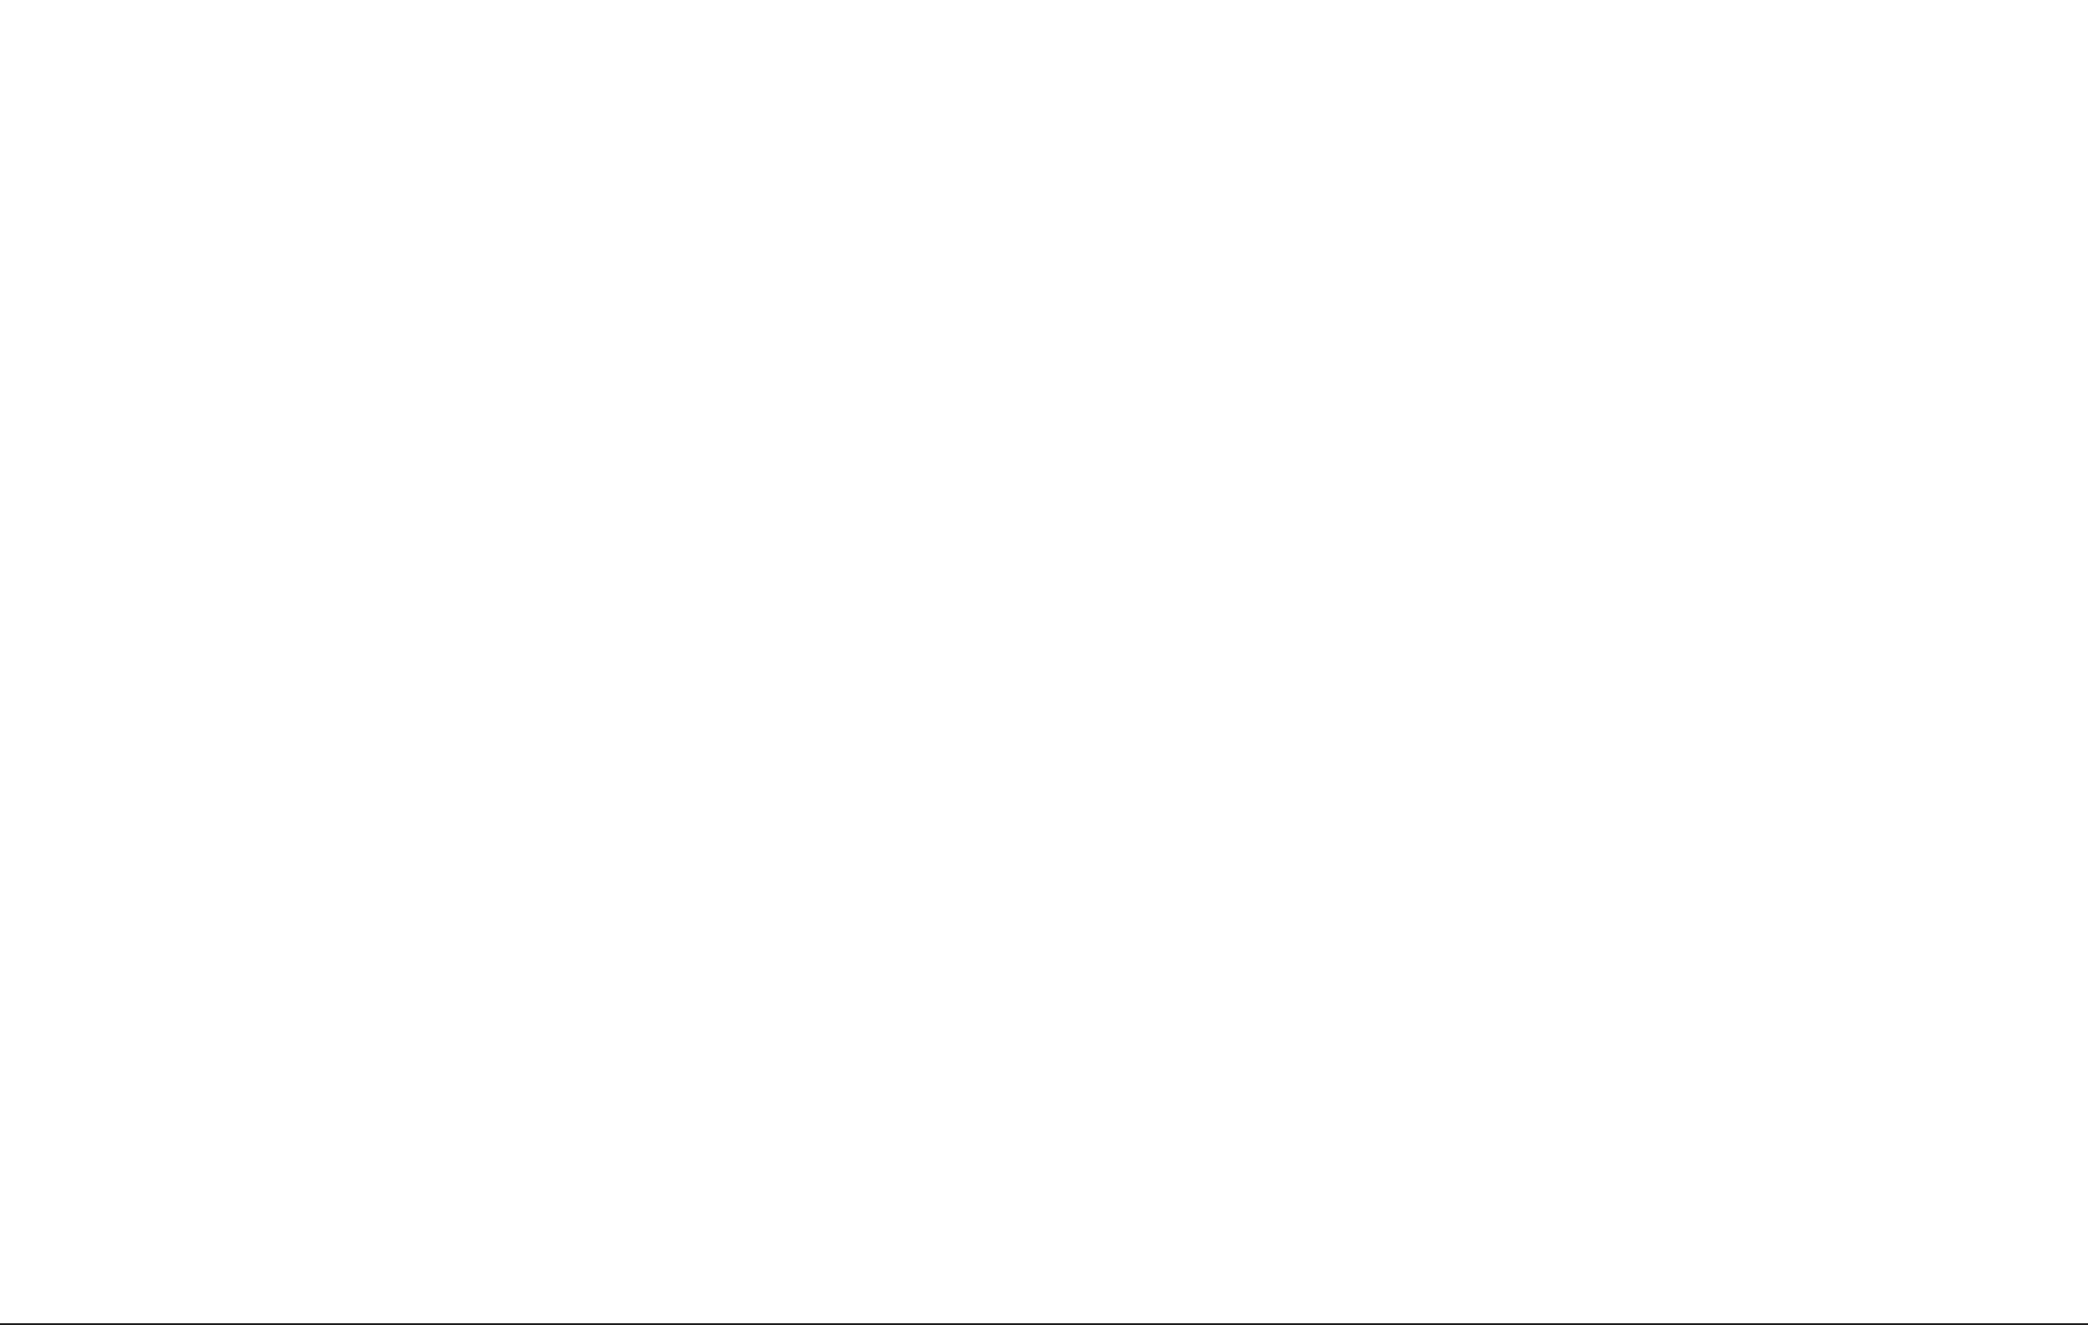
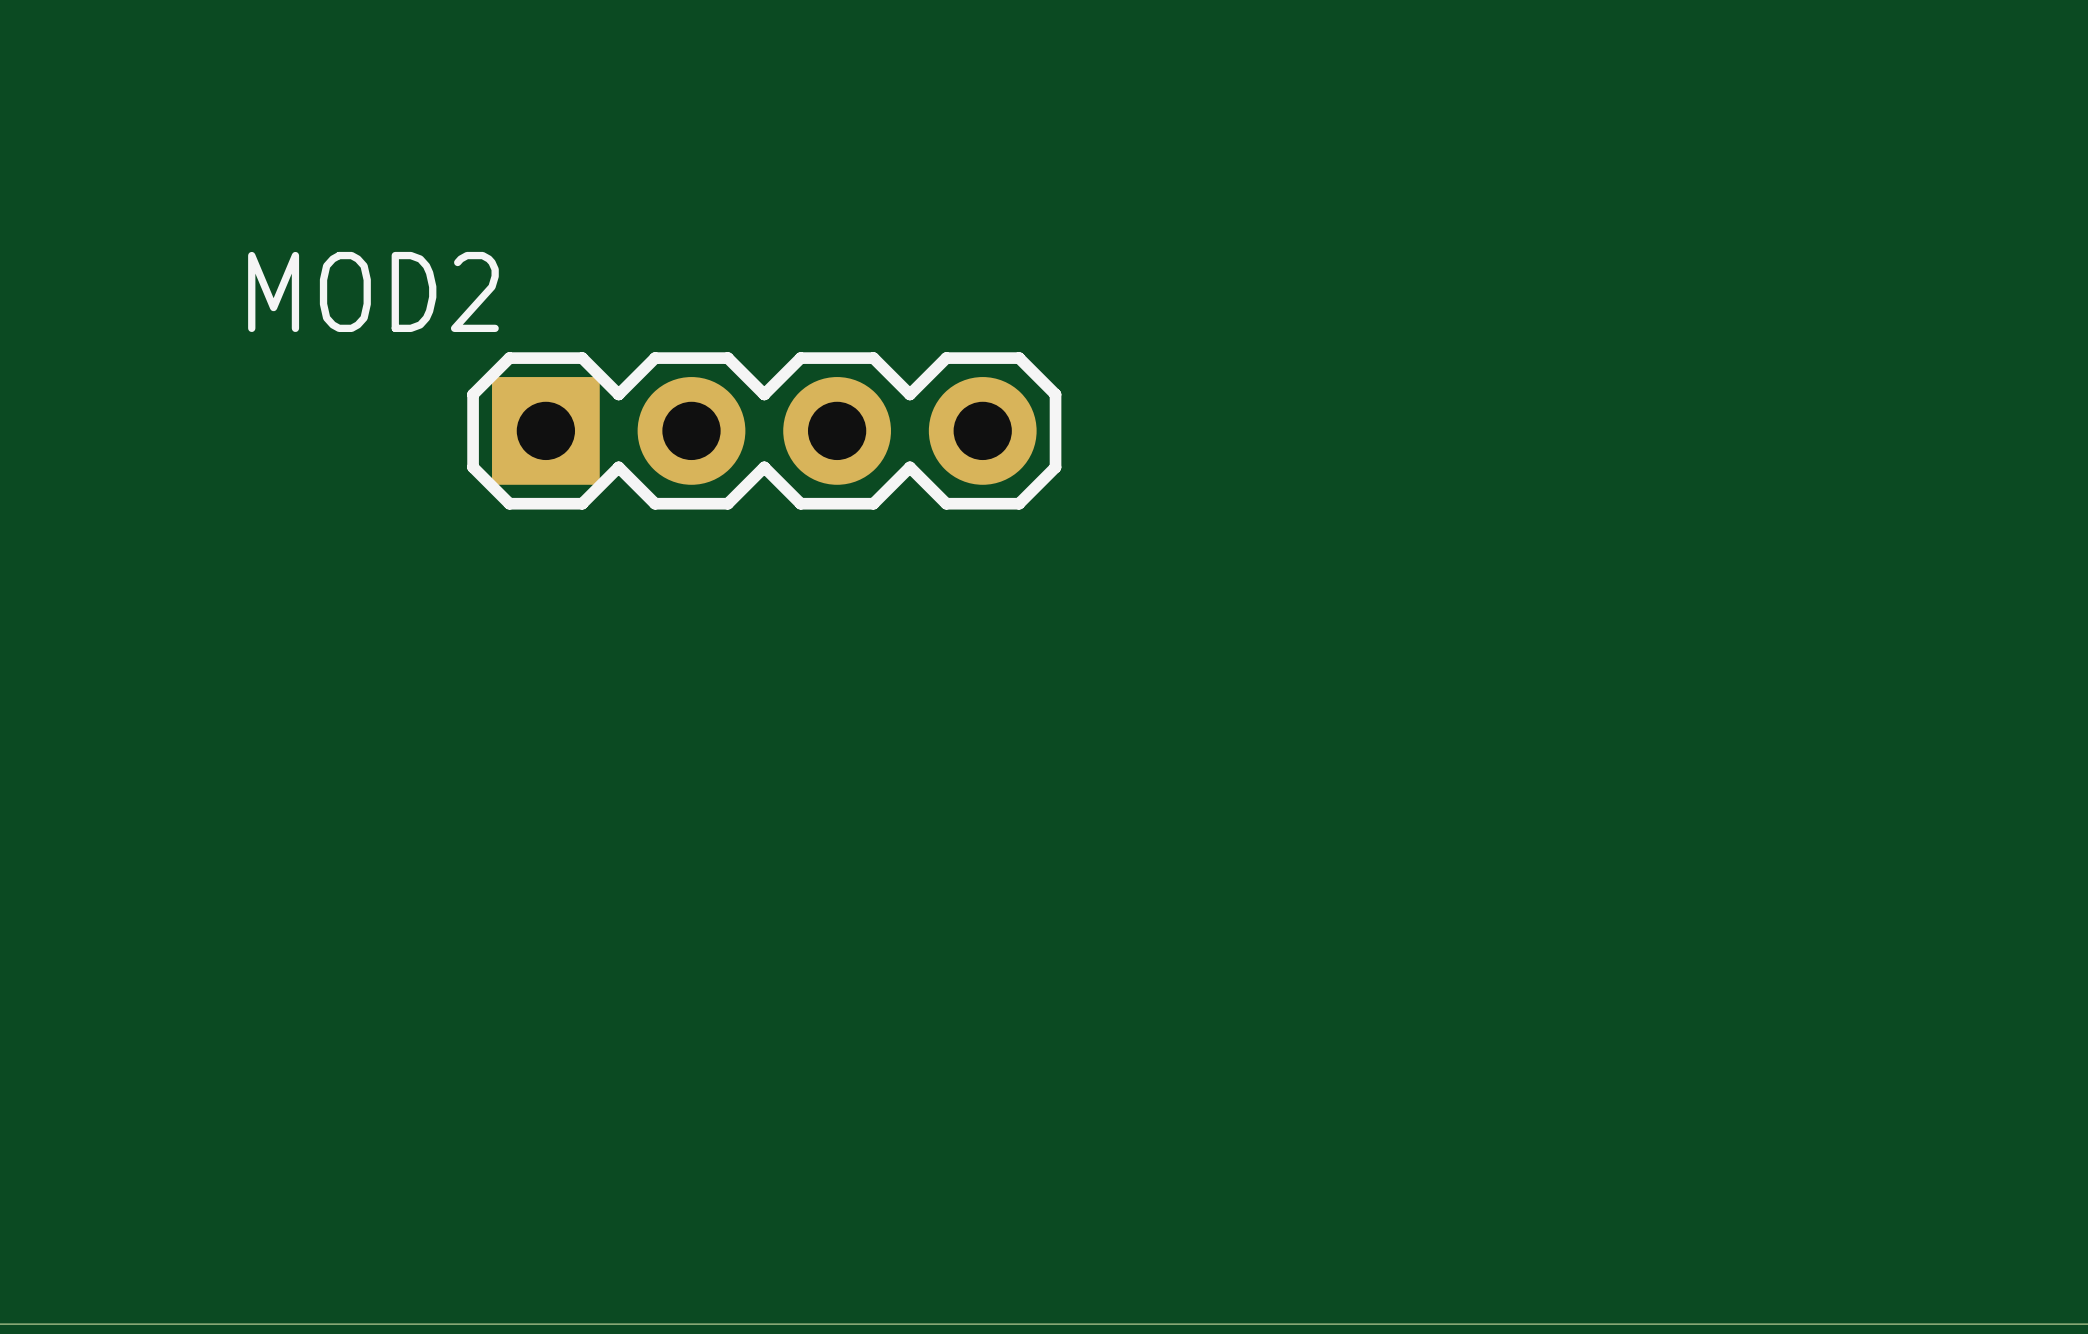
MOD2: none -> (764, 430)

